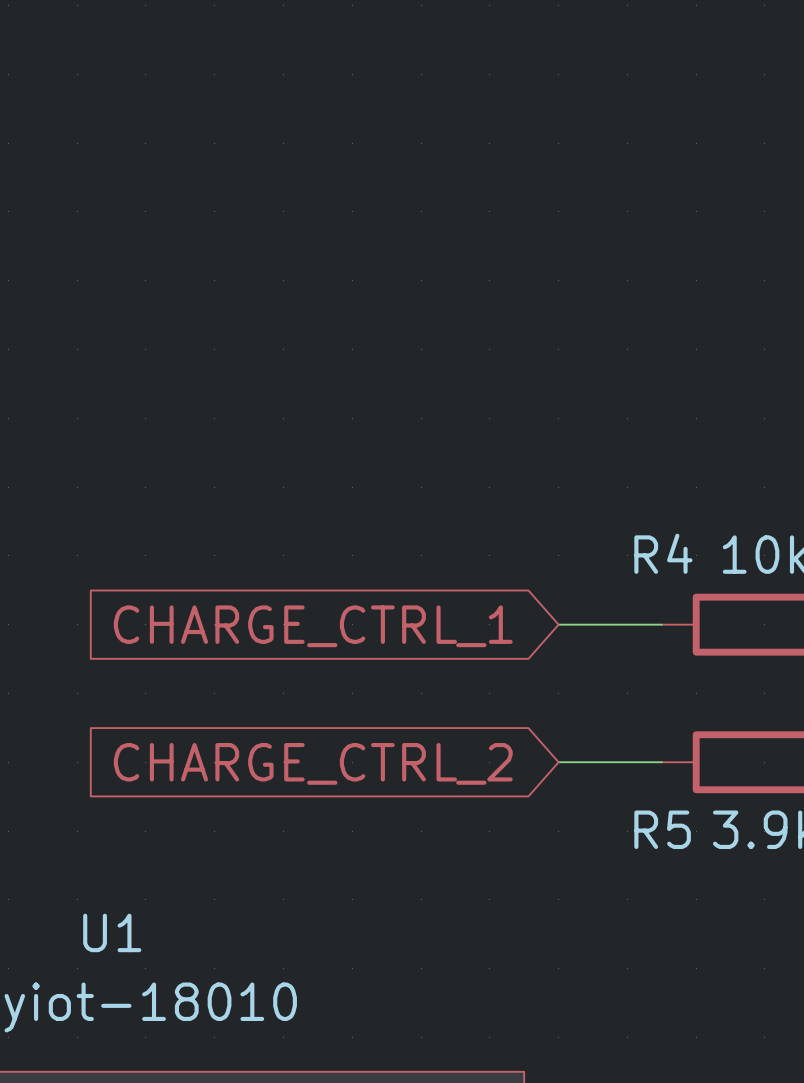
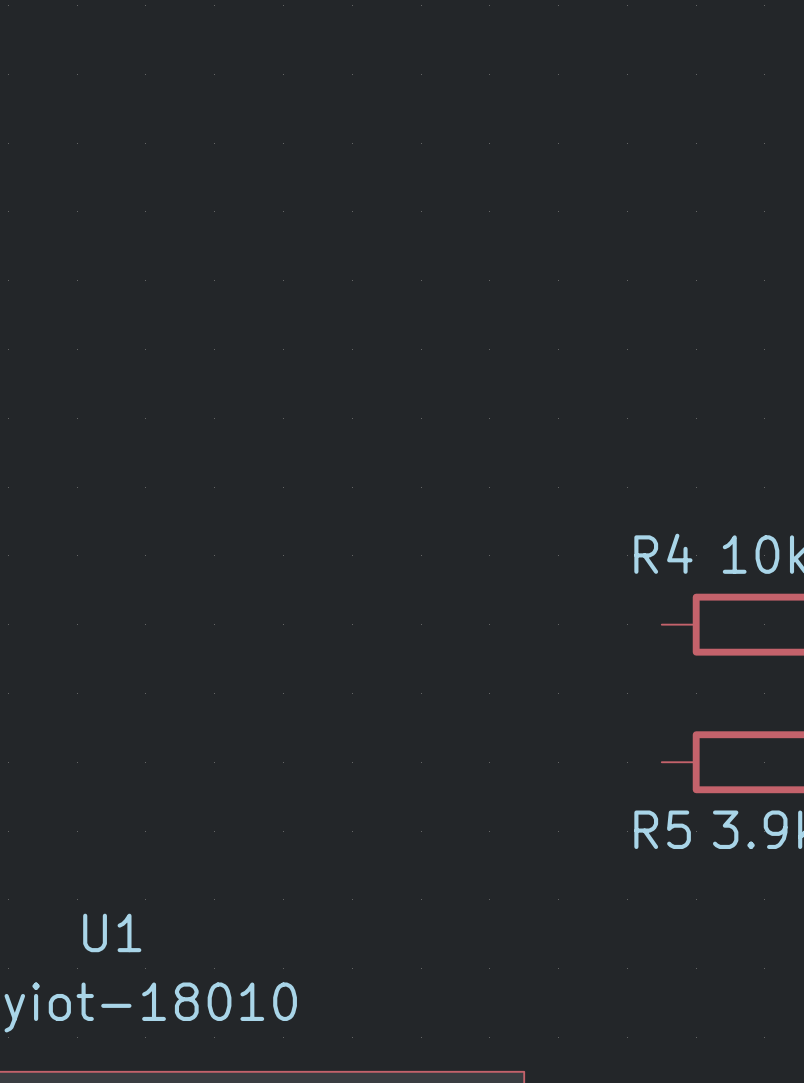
wire: (558, 624) (661, 624) -> none
global label: CHARGE_CTRL_1 (313, 626) -> none
wire: (558, 762) (661, 762) -> none
global label: CHARGE_CTRL_2 (313, 763) -> none

